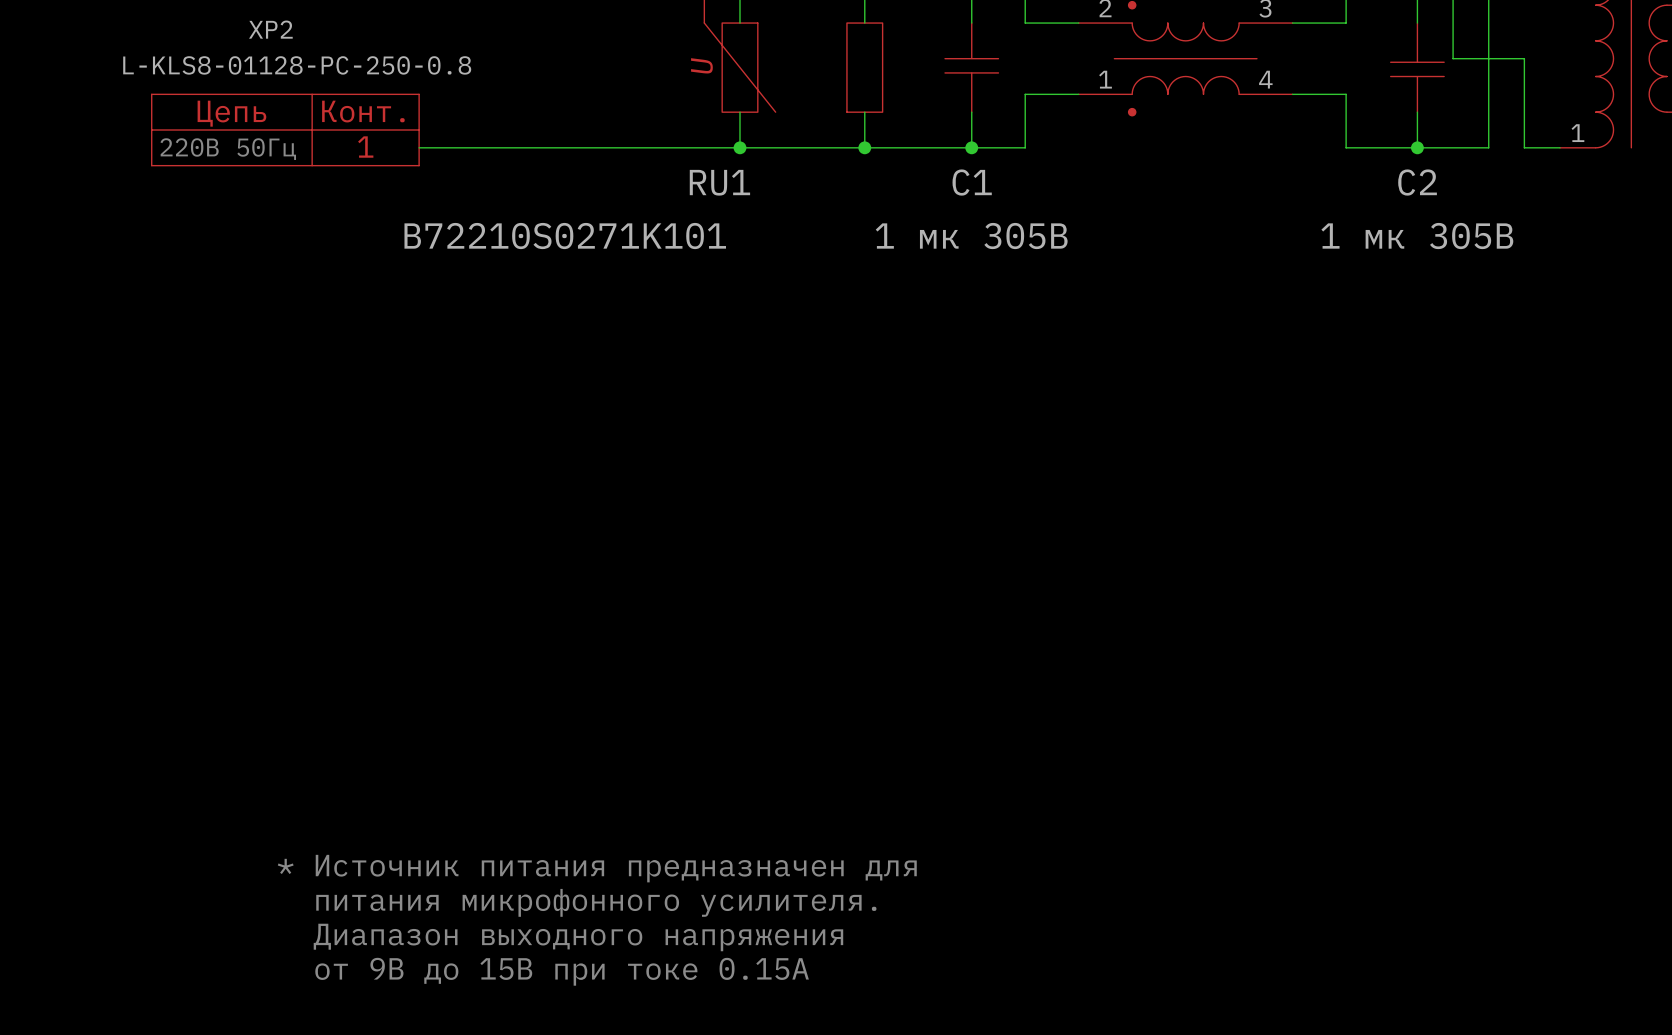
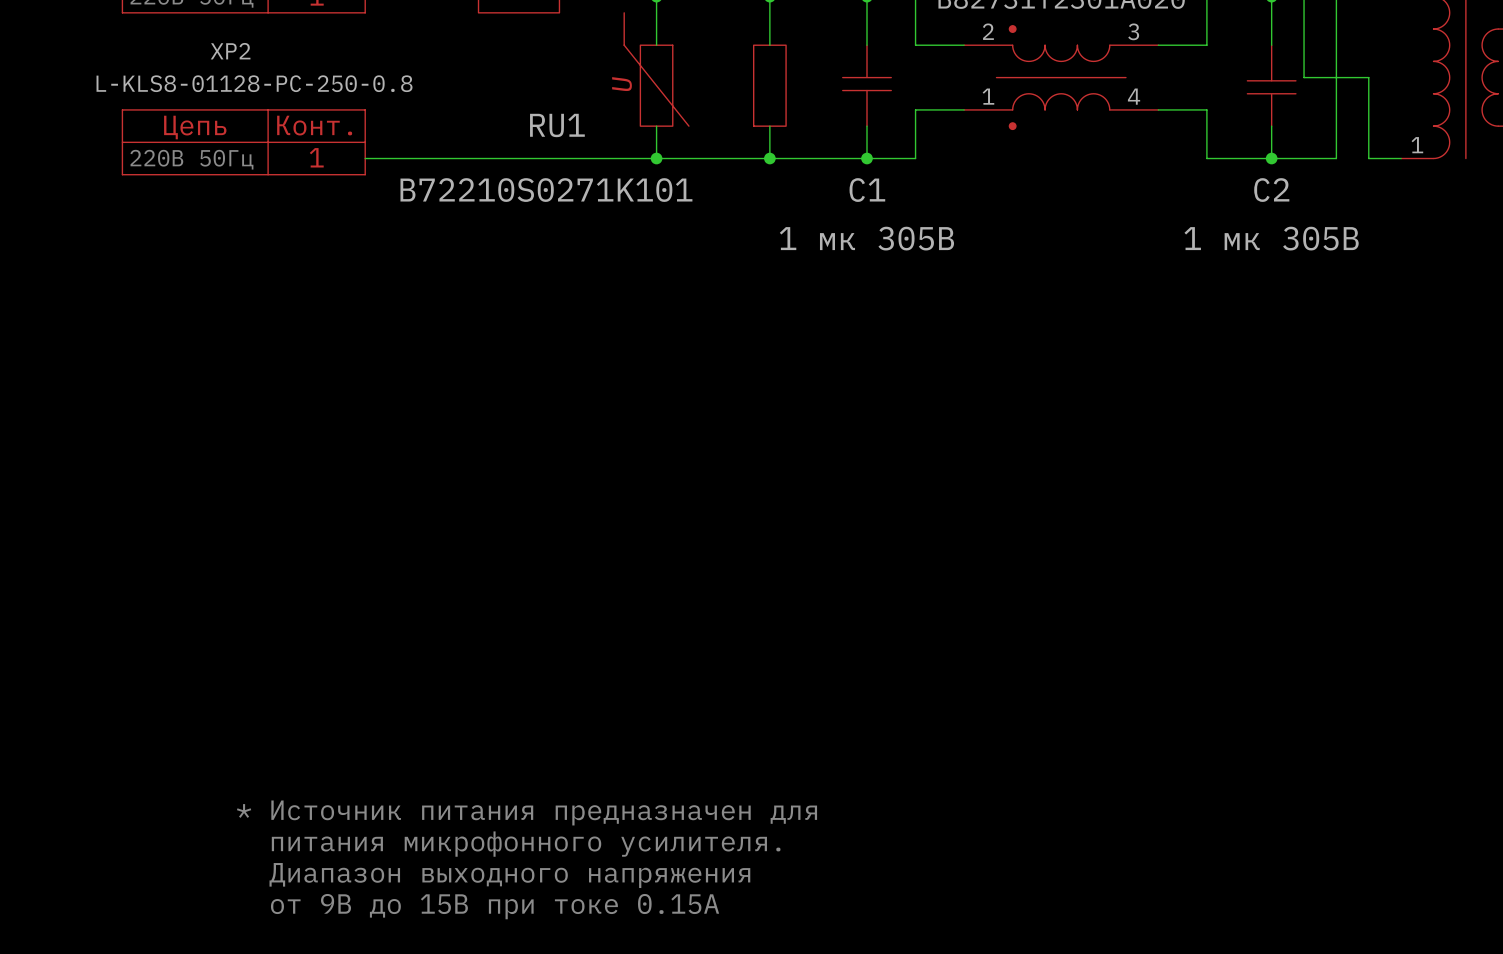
RU1 name position: RU1 (719, 182) -> RU1 (557, 125)
RU1 value position: B72210S0271K101 (565, 236) -> B72210S0271K101 (546, 190)

